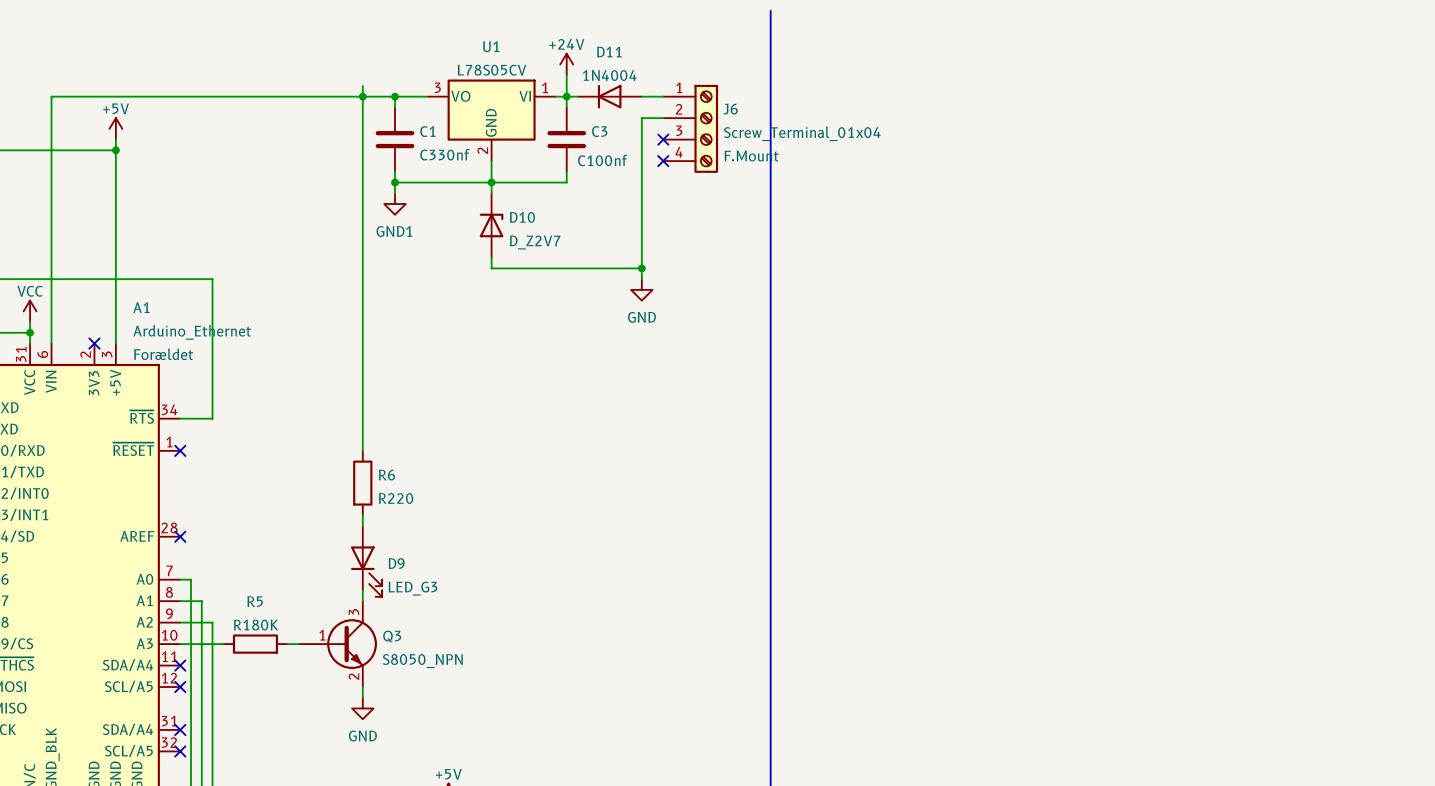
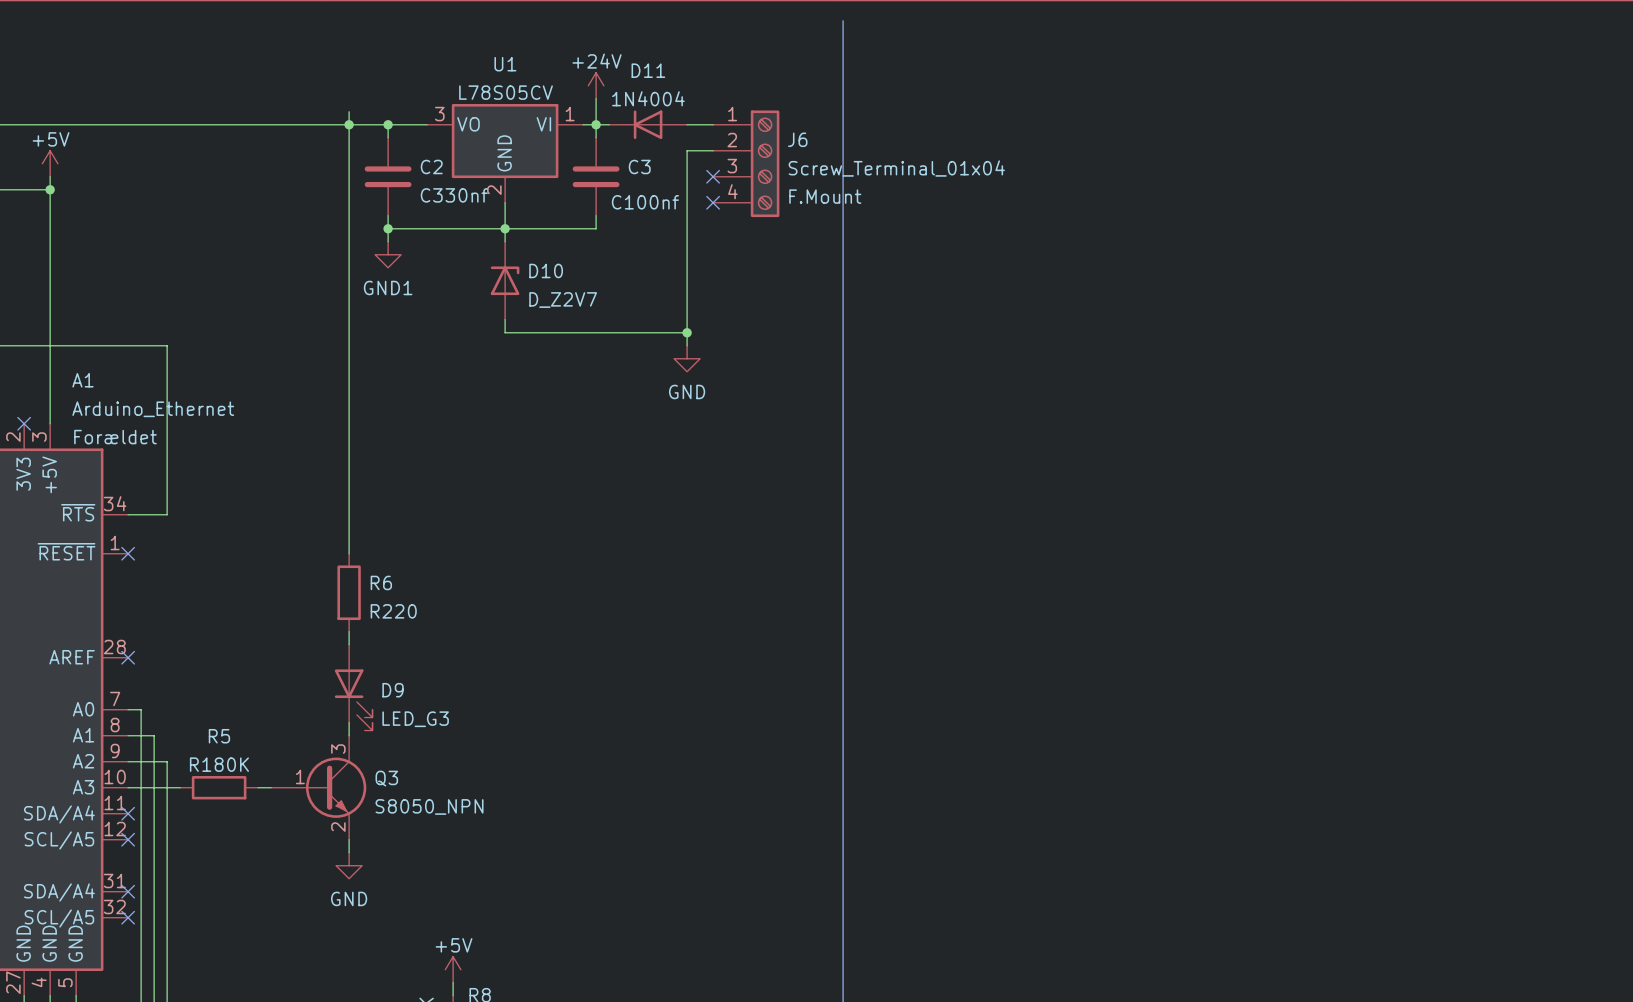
C1 name: C1 (427, 131) -> C2 (431, 166)

